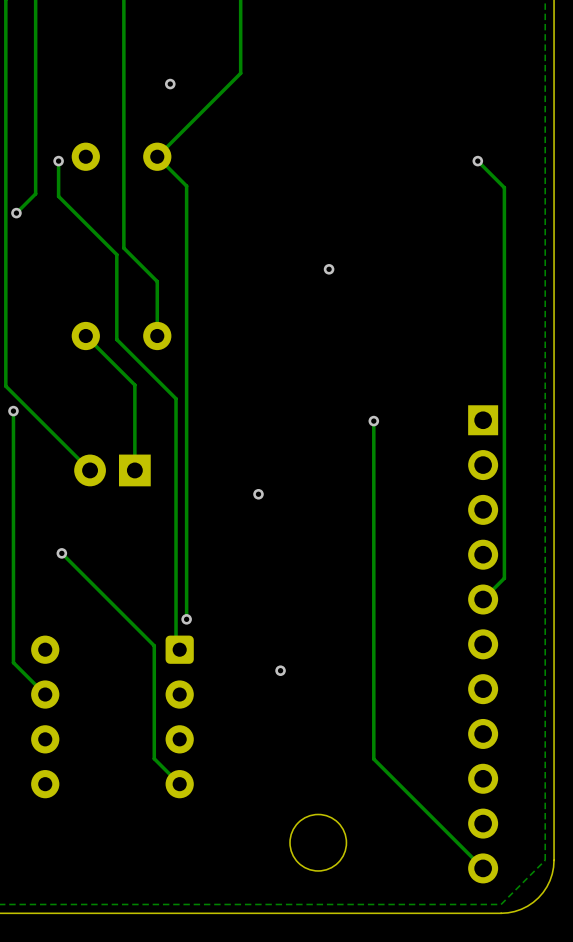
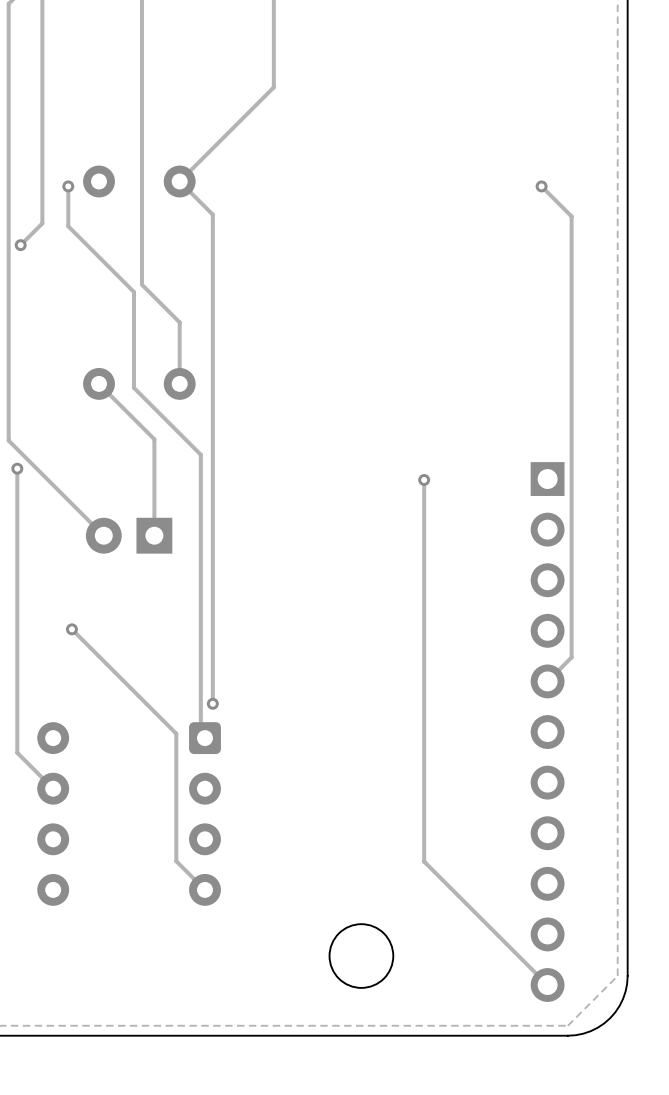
via: (170, 84) -> none
via: (329, 269) -> none
via: (258, 494) -> none
via: (280, 670) -> none

